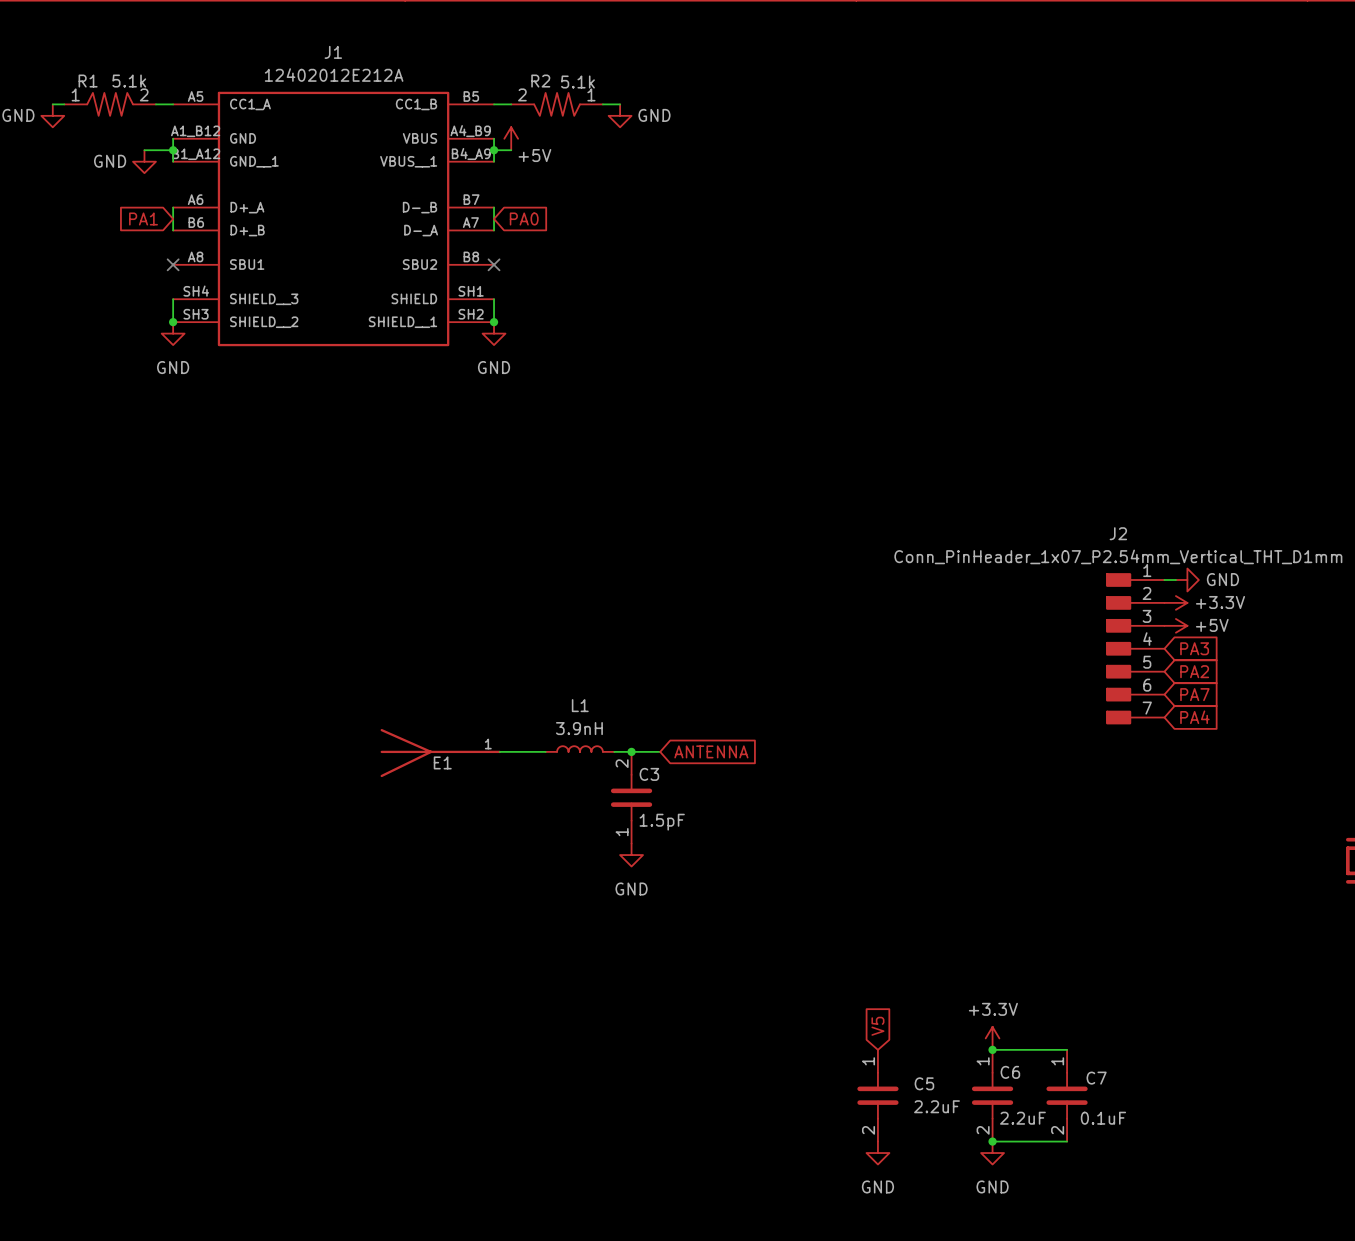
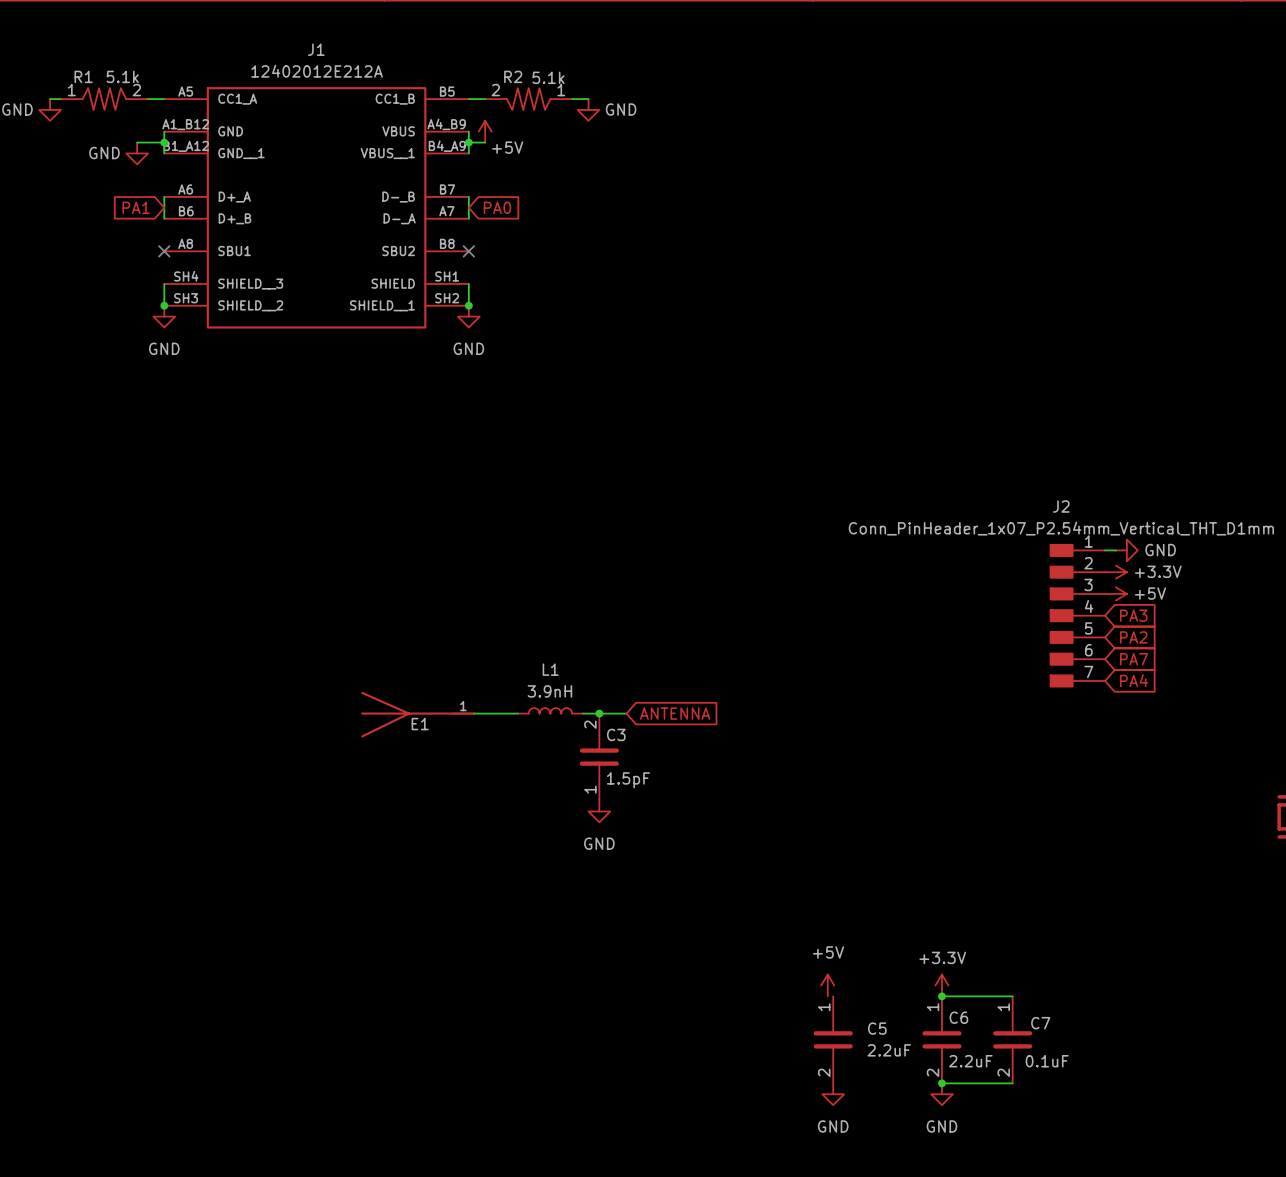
global label: V5 (877, 1026) -> none
power symbol: none -> +5V (827, 985)

